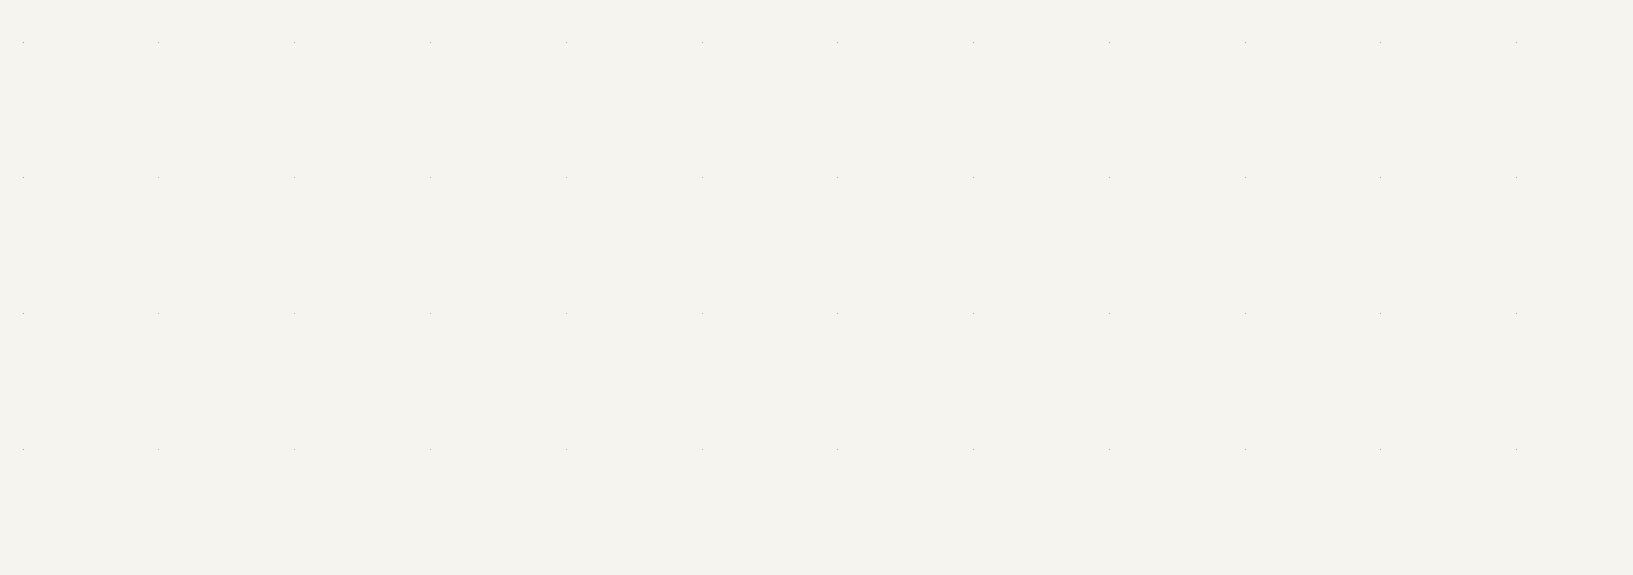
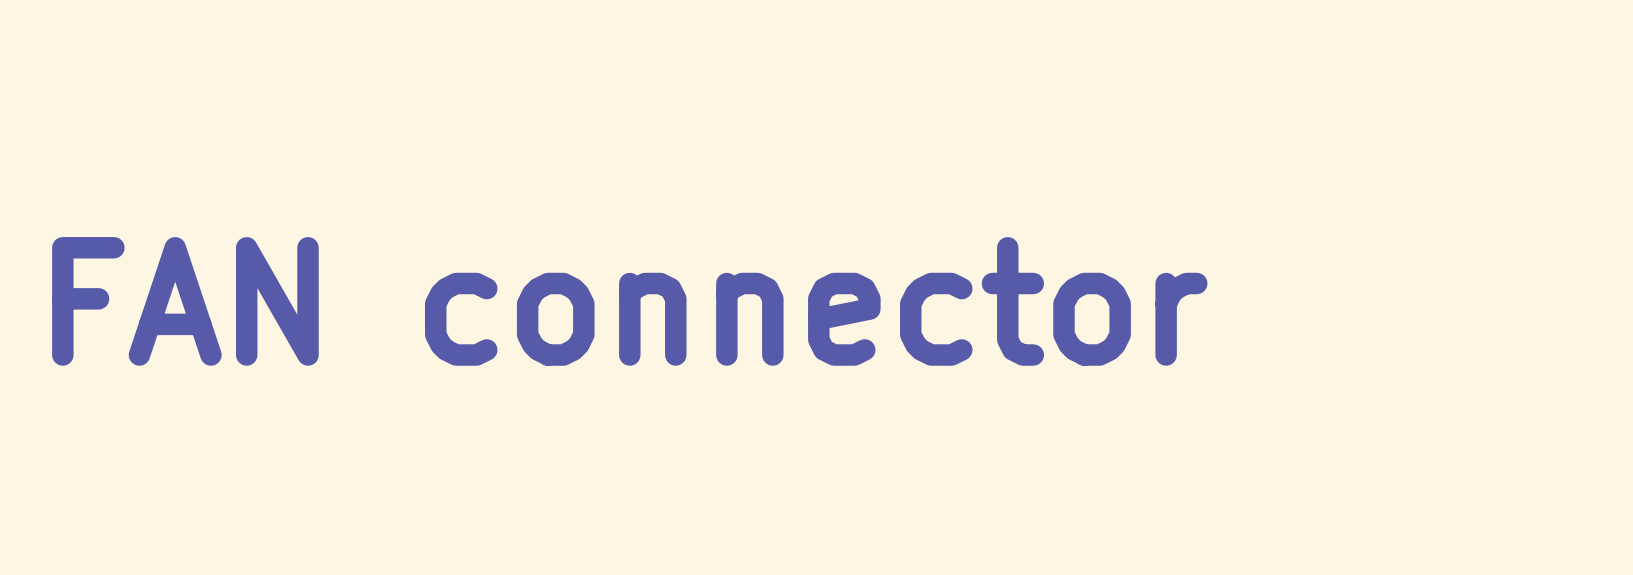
text: none -> FAN connector (629, 301)

